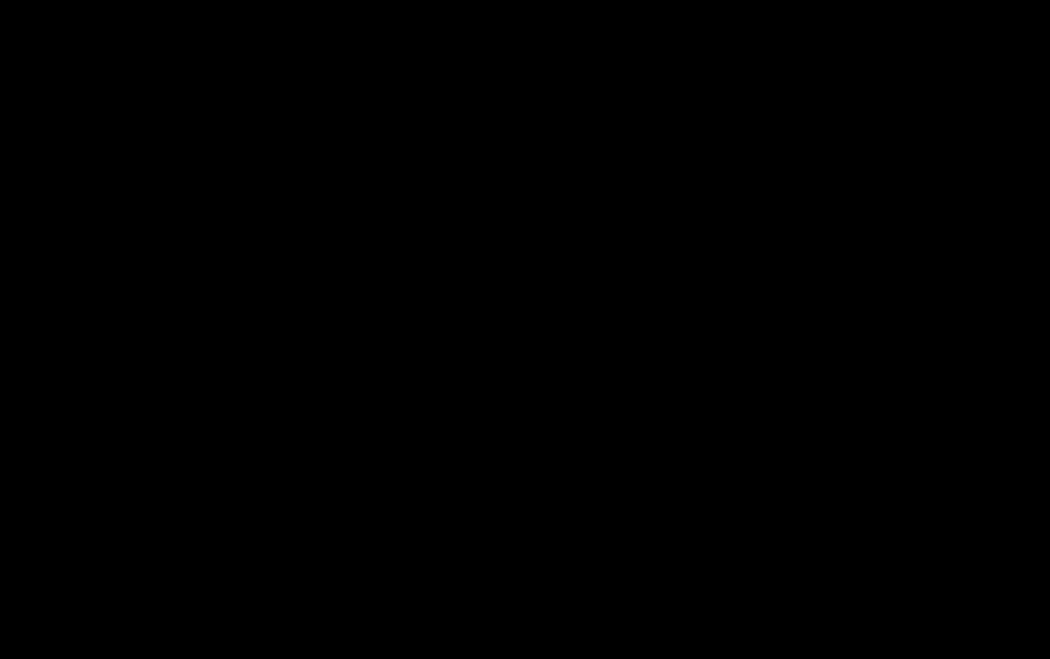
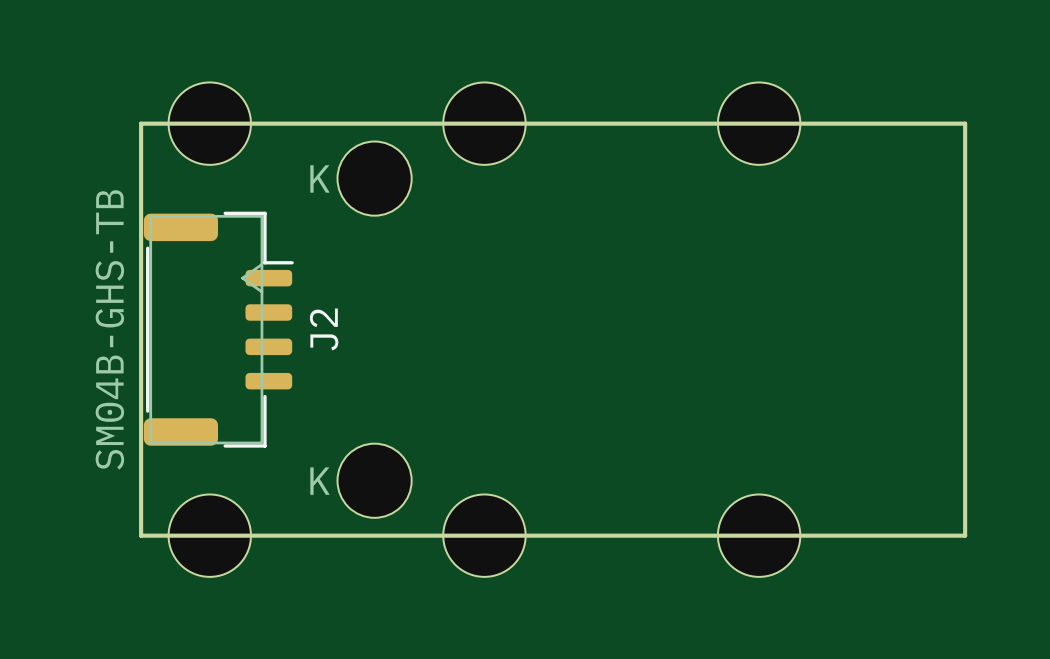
board edge: none -> (141, 123) (965, 123) (965, 535) (141, 535) (141, 123)
part: none -> (209, 123)
part: none -> (484, 123)
part: none -> (759, 123)
part: none -> (374, 178)
J2: none -> SM04B-GHS-TB (218, 329)
part: none -> (374, 480)
part: none -> (209, 535)
part: none -> (484, 535)
part: none -> (759, 535)

